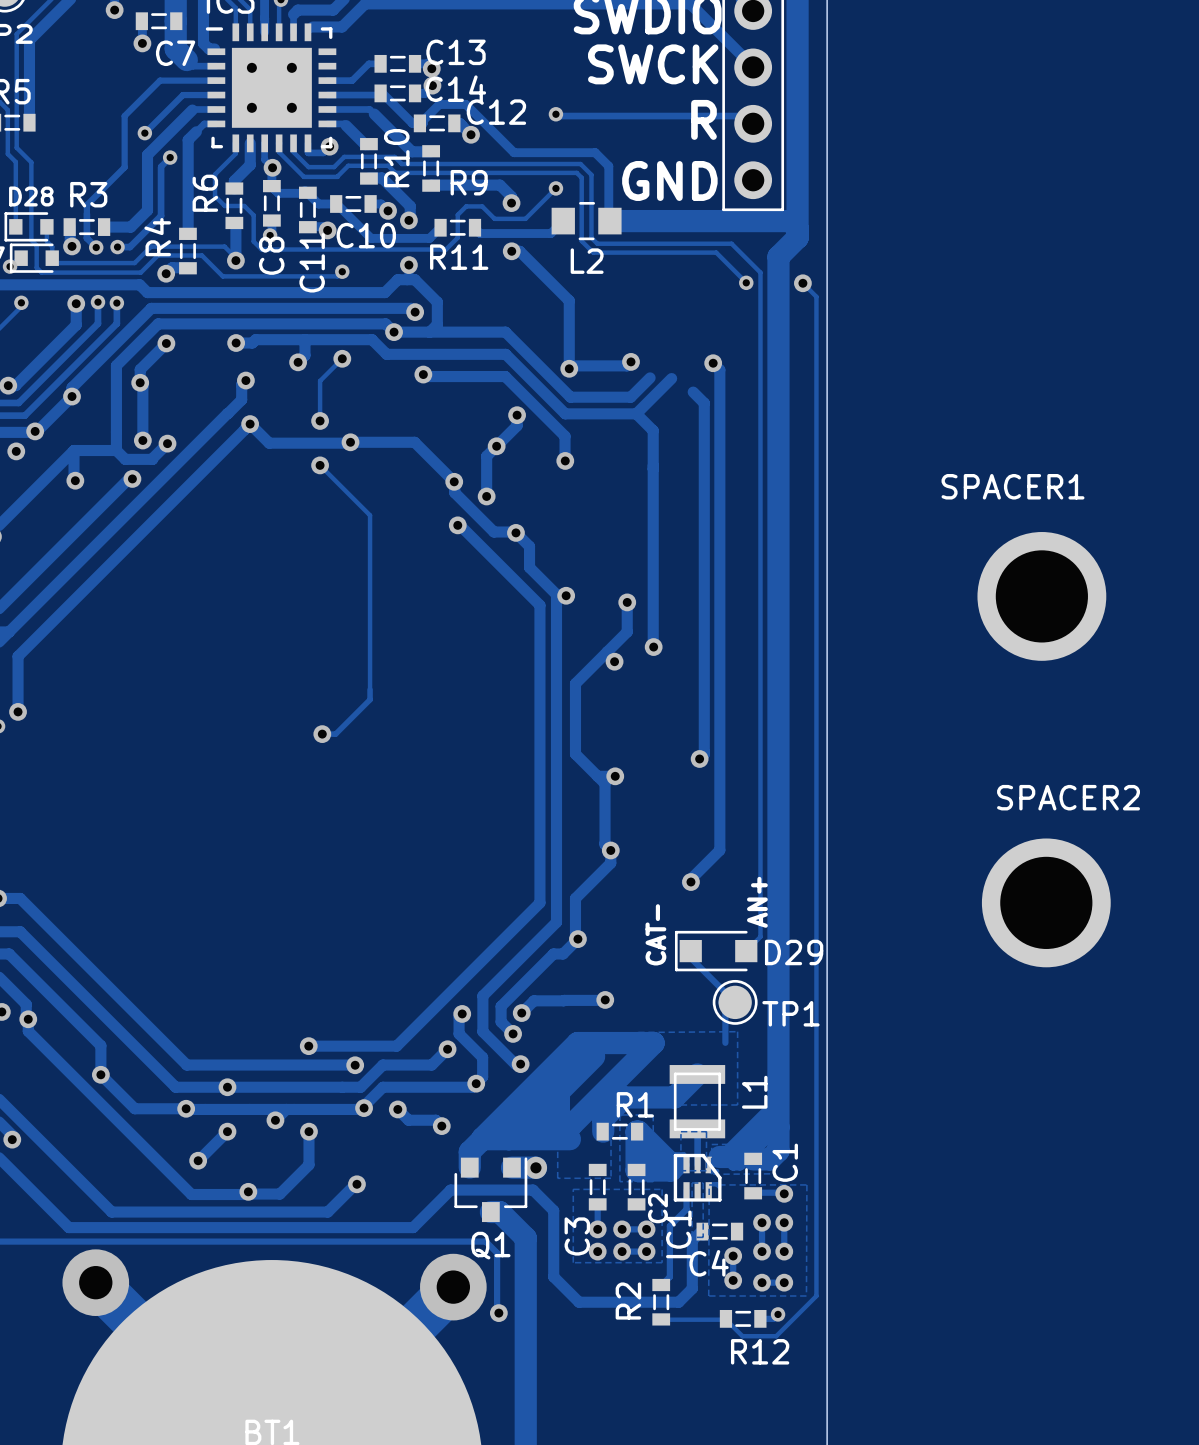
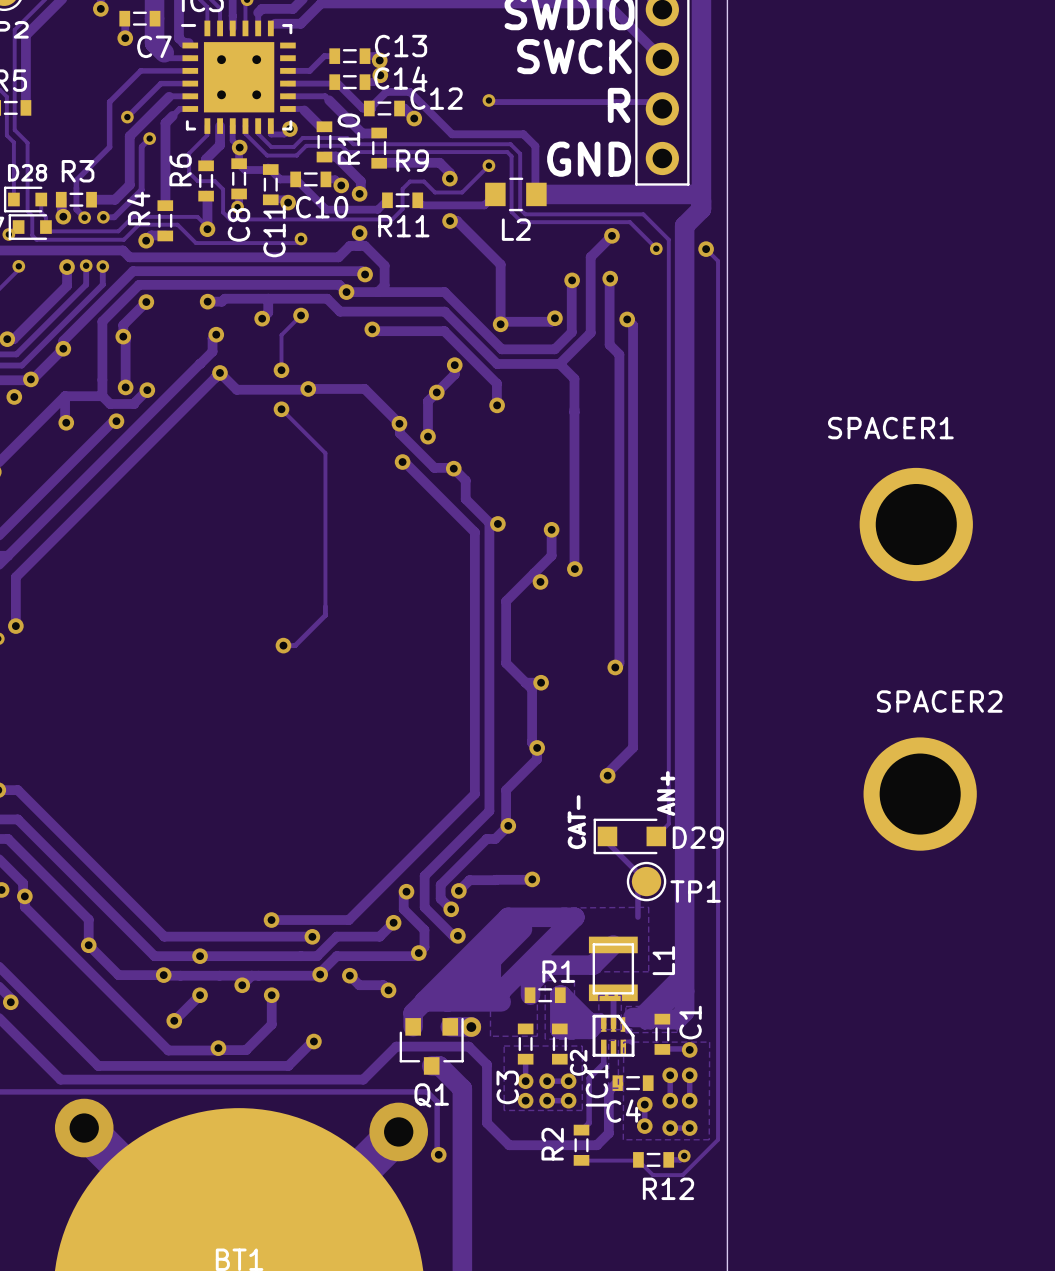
track: none -> (611, 235) (590, 257) (590, 332)
via: none -> (611, 235)
track: none -> (610, 278) (609, 344)
via: none -> (610, 278)
track: none -> (572, 280) (571, 332)
via: none -> (572, 280)

